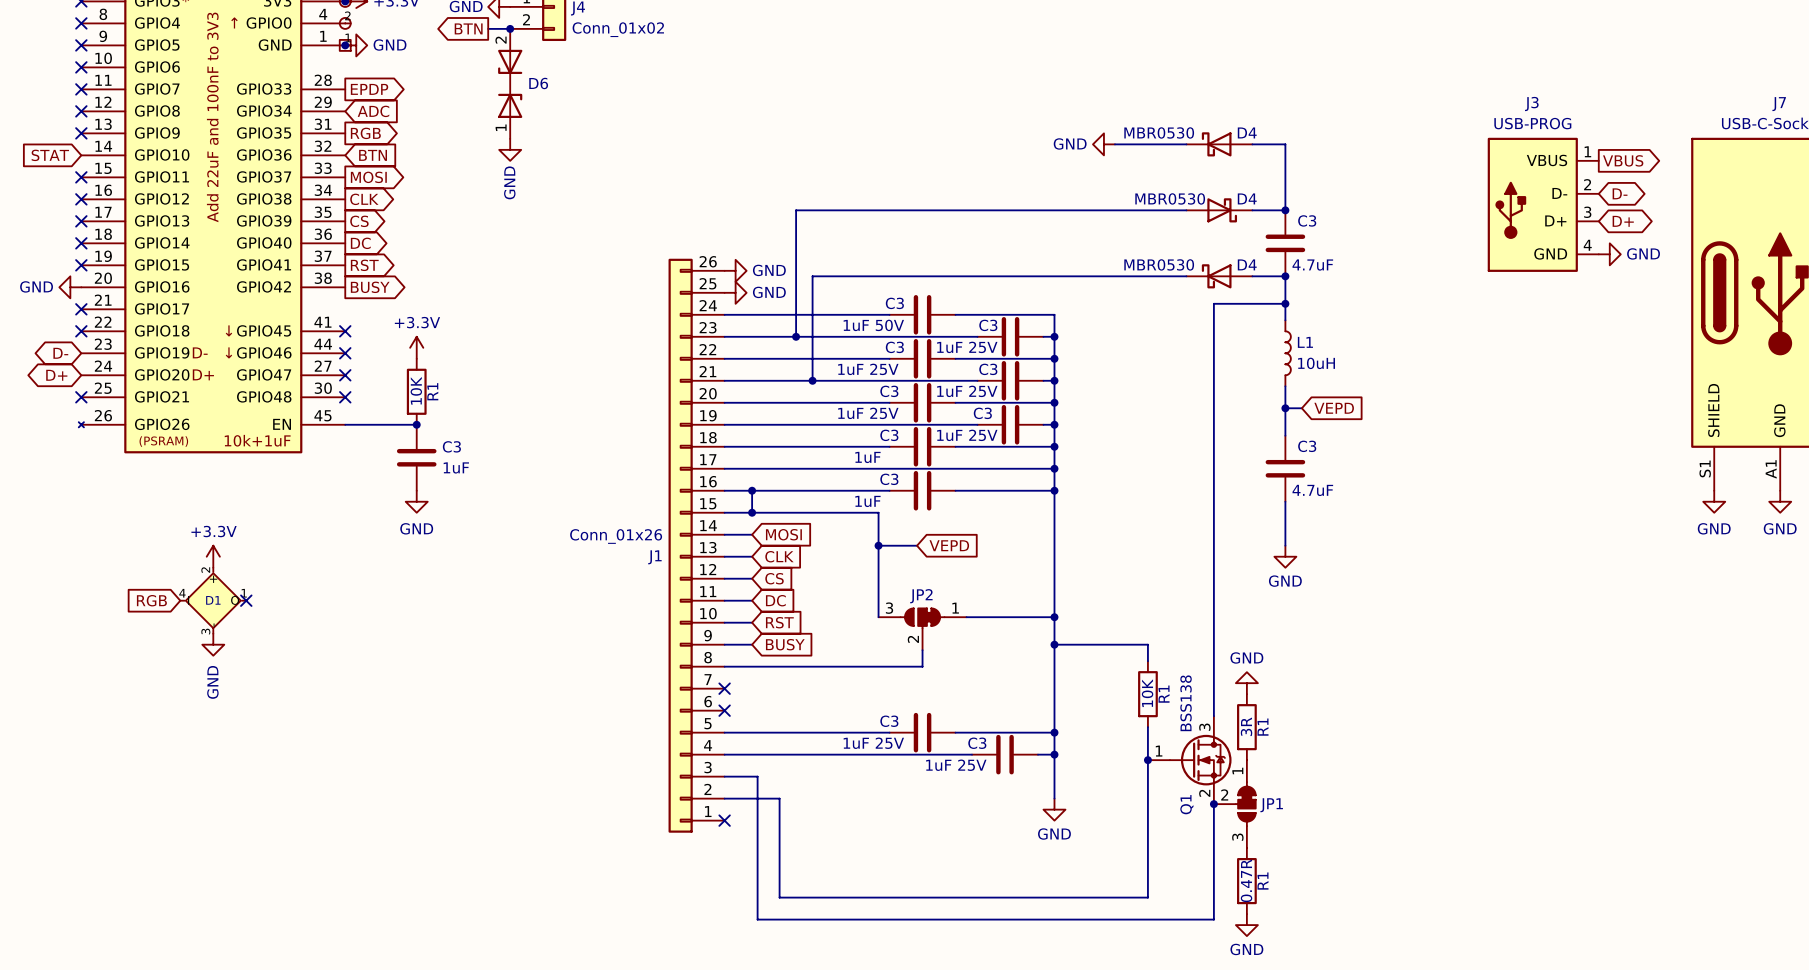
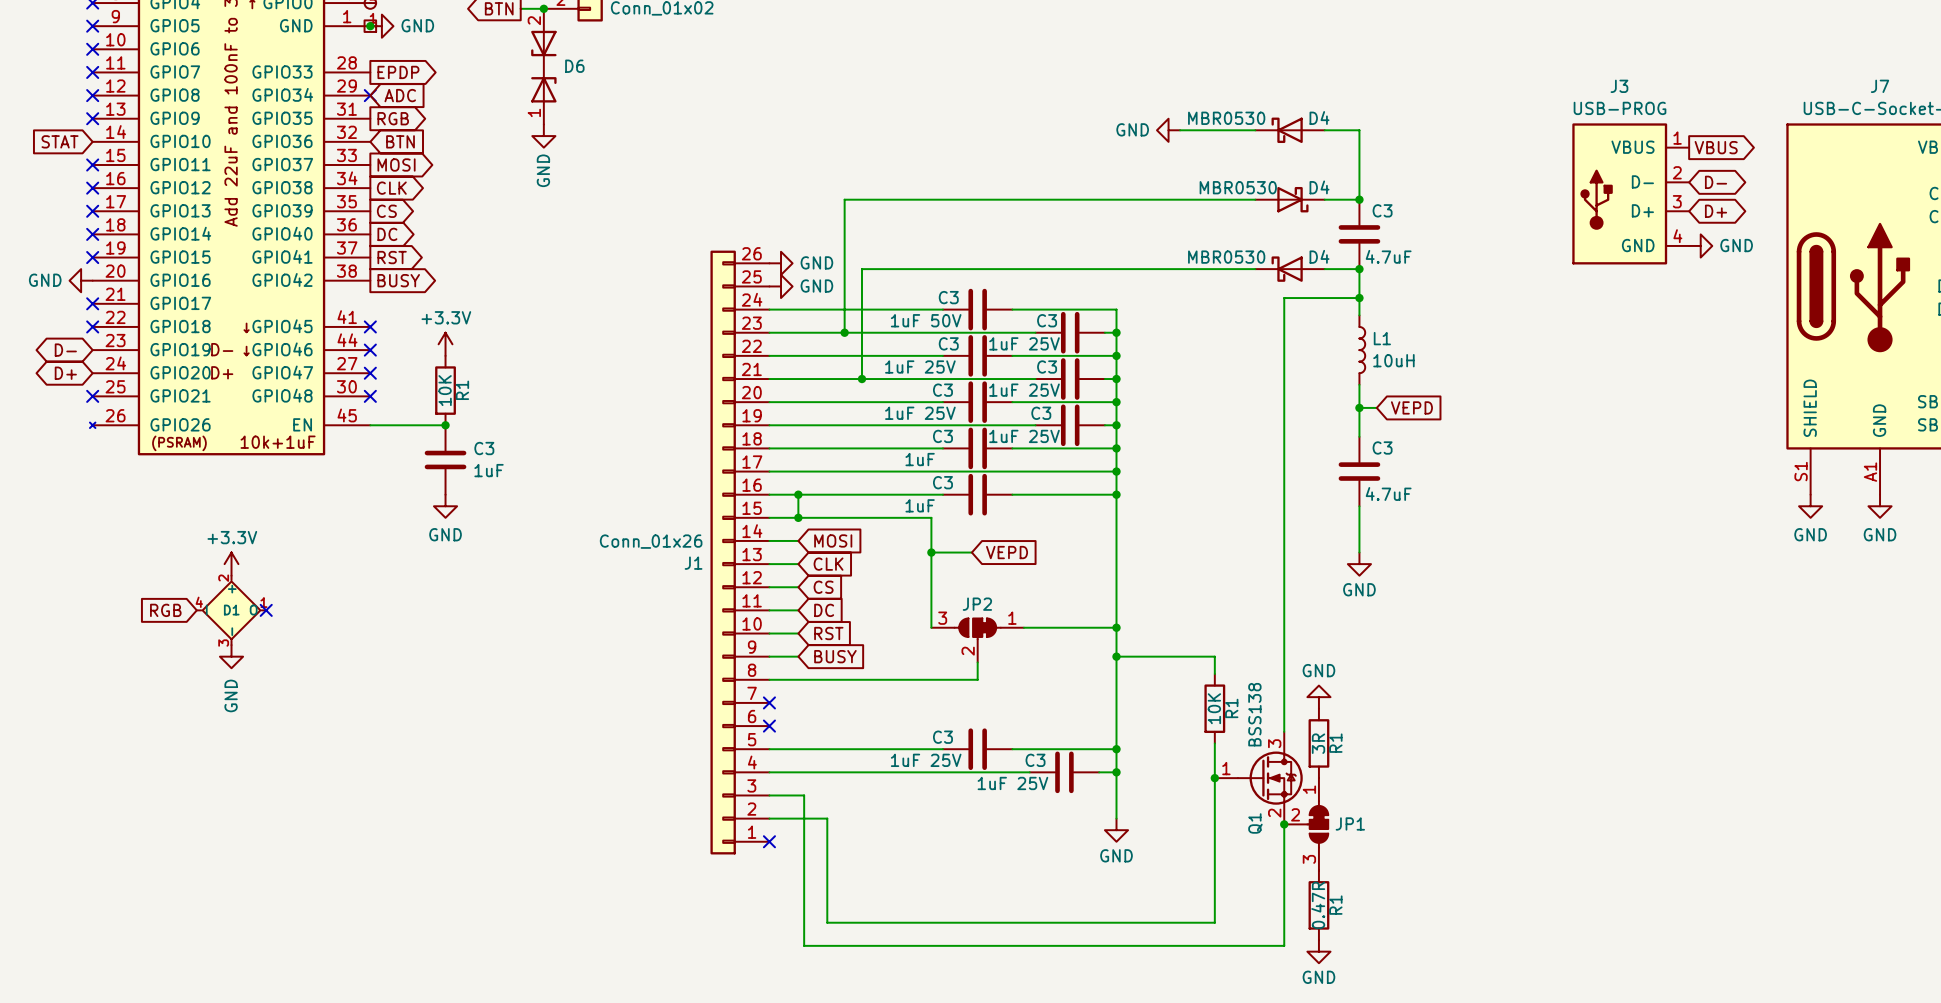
no-connect mark: none -> (370, 95)

